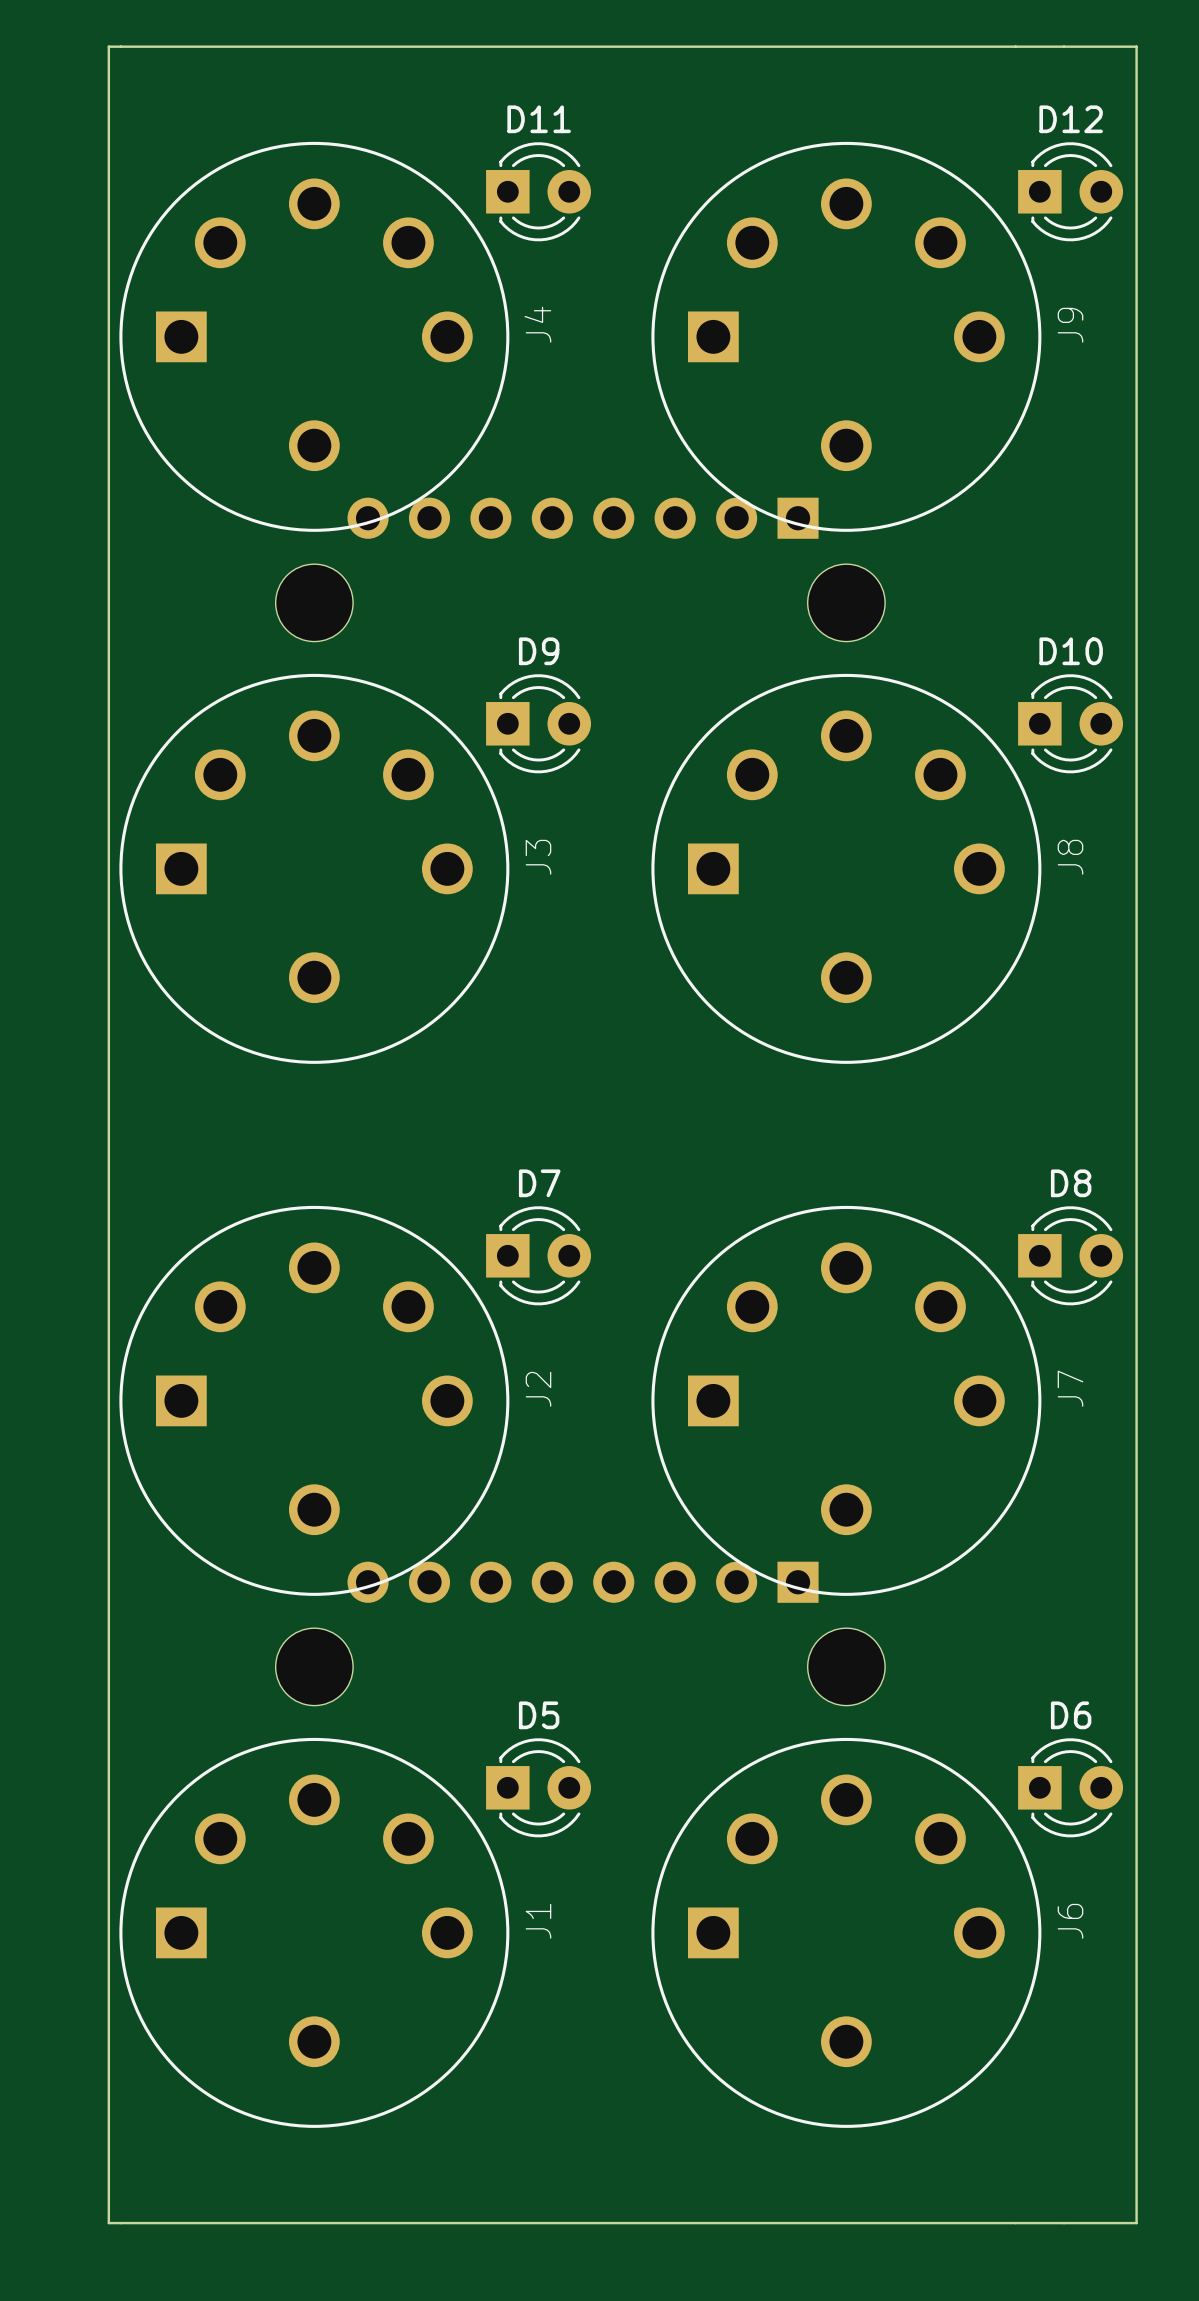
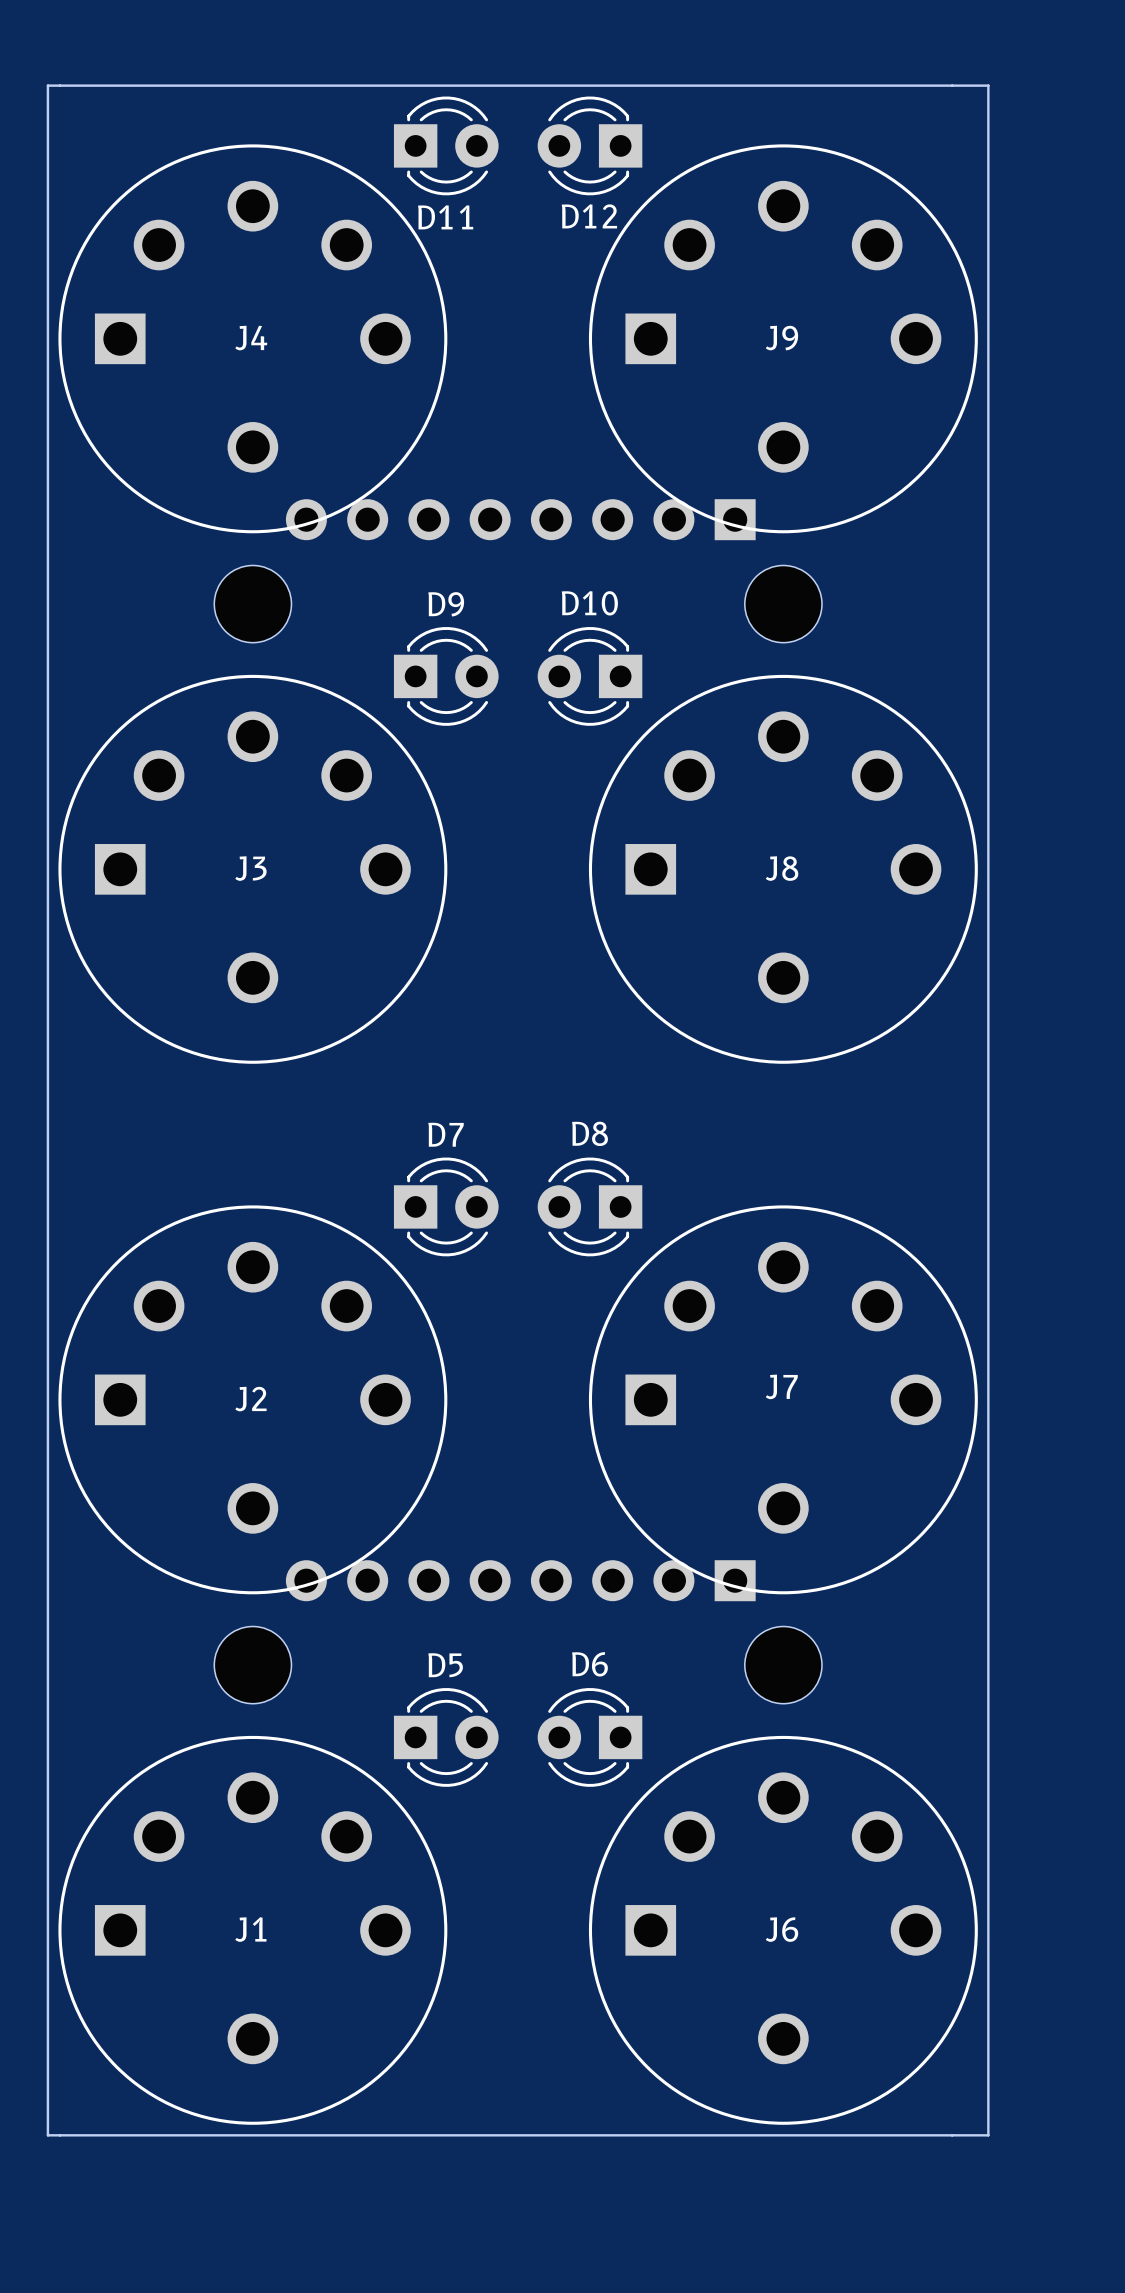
board edge: (108, 82) (108, 46) (1136, 46) (1136, 2223) (108, 2223) (108, 2138) -> (47, 85) (988, 85) (988, 2135) (47, 2135)
D11 name position: D11 (539, 119) -> D11 (445, 217)
D11 position: (538, 191) -> (446, 145)
D12 rotation: 0° (1070, 191) -> 180° (590, 145)
D12 position: (1070, 191) -> (590, 145)
J4 name rotation: 0° (537, 324) -> 90° clockwise (251, 338)
J4 name position: J4 (537, 324) -> J4 (251, 338)
J9 name rotation: 0° (1070, 325) -> 90° clockwise (781, 338)
J9 name position: J9 (1070, 325) -> J9 (781, 338)
D9 position: (538, 723) -> (446, 676)
D10 rotation: 0° (1070, 723) -> 180° (590, 676)
D10 position: (1070, 723) -> (590, 676)
J3 name rotation: 0° (538, 857) -> 90° clockwise (250, 868)
J3 name position: J3 (538, 857) -> J3 (250, 868)
J8 name rotation: 0° (1070, 857) -> 90° clockwise (782, 868)
J8 name position: J8 (1070, 857) -> J8 (782, 868)
D7 position: (538, 1255) -> (446, 1206)
D8 rotation: 0° (1070, 1255) -> 180° (590, 1206)
D8 position: (1070, 1255) -> (590, 1206)
J7 name rotation: 0° (1070, 1388) -> 90° clockwise (781, 1386)
J7 name position: J7 (1070, 1388) -> J7 (781, 1386)
J2 name rotation: 0° (538, 1389) -> 90° clockwise (250, 1399)
J2 name position: J2 (538, 1389) -> J2 (250, 1399)
D5 position: (538, 1787) -> (446, 1737)
D6 rotation: 0° (1070, 1787) -> 180° (590, 1737)
D6 position: (1070, 1787) -> (590, 1737)
J1 name rotation: 0° (538, 1921) -> 90° clockwise (250, 1929)
J1 name position: J1 (538, 1921) -> J1 (250, 1929)
J6 name rotation: 0° (1070, 1921) -> 90° clockwise (782, 1929)
J6 name position: J6 (1070, 1921) -> J6 (782, 1929)

